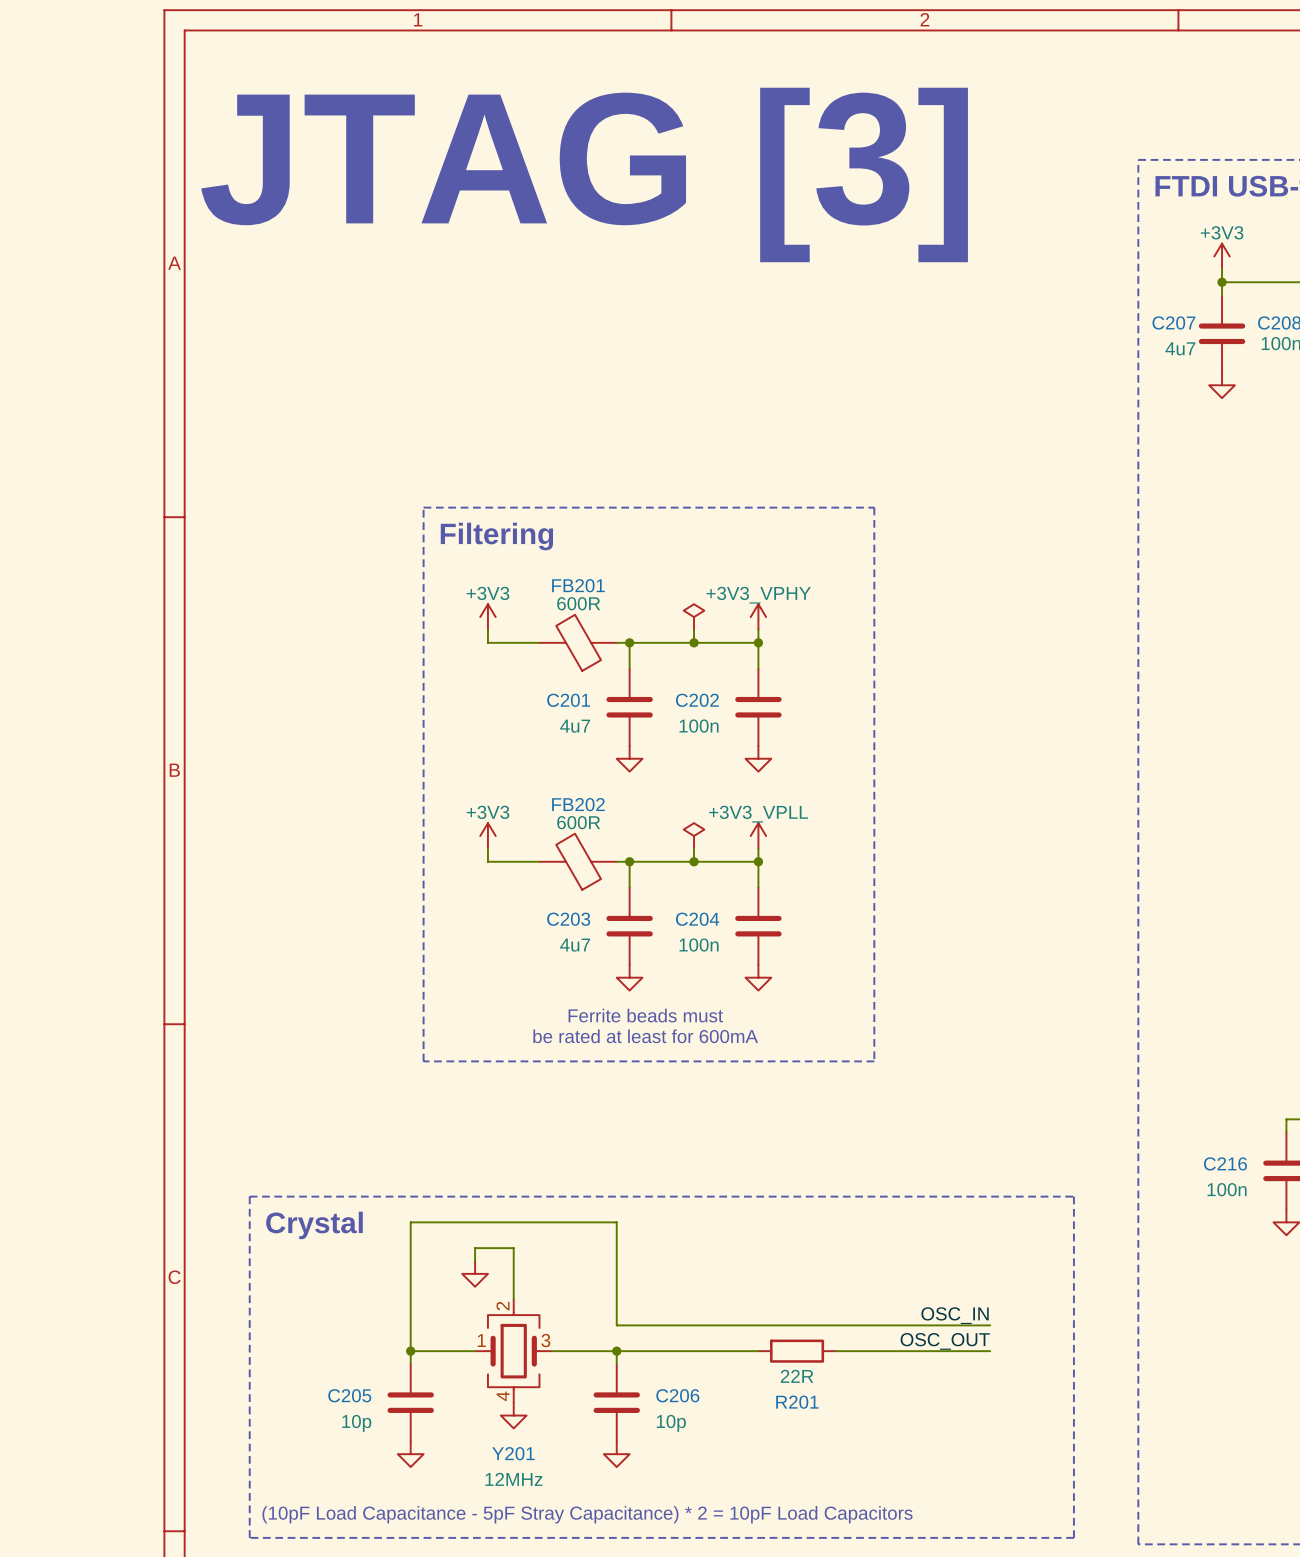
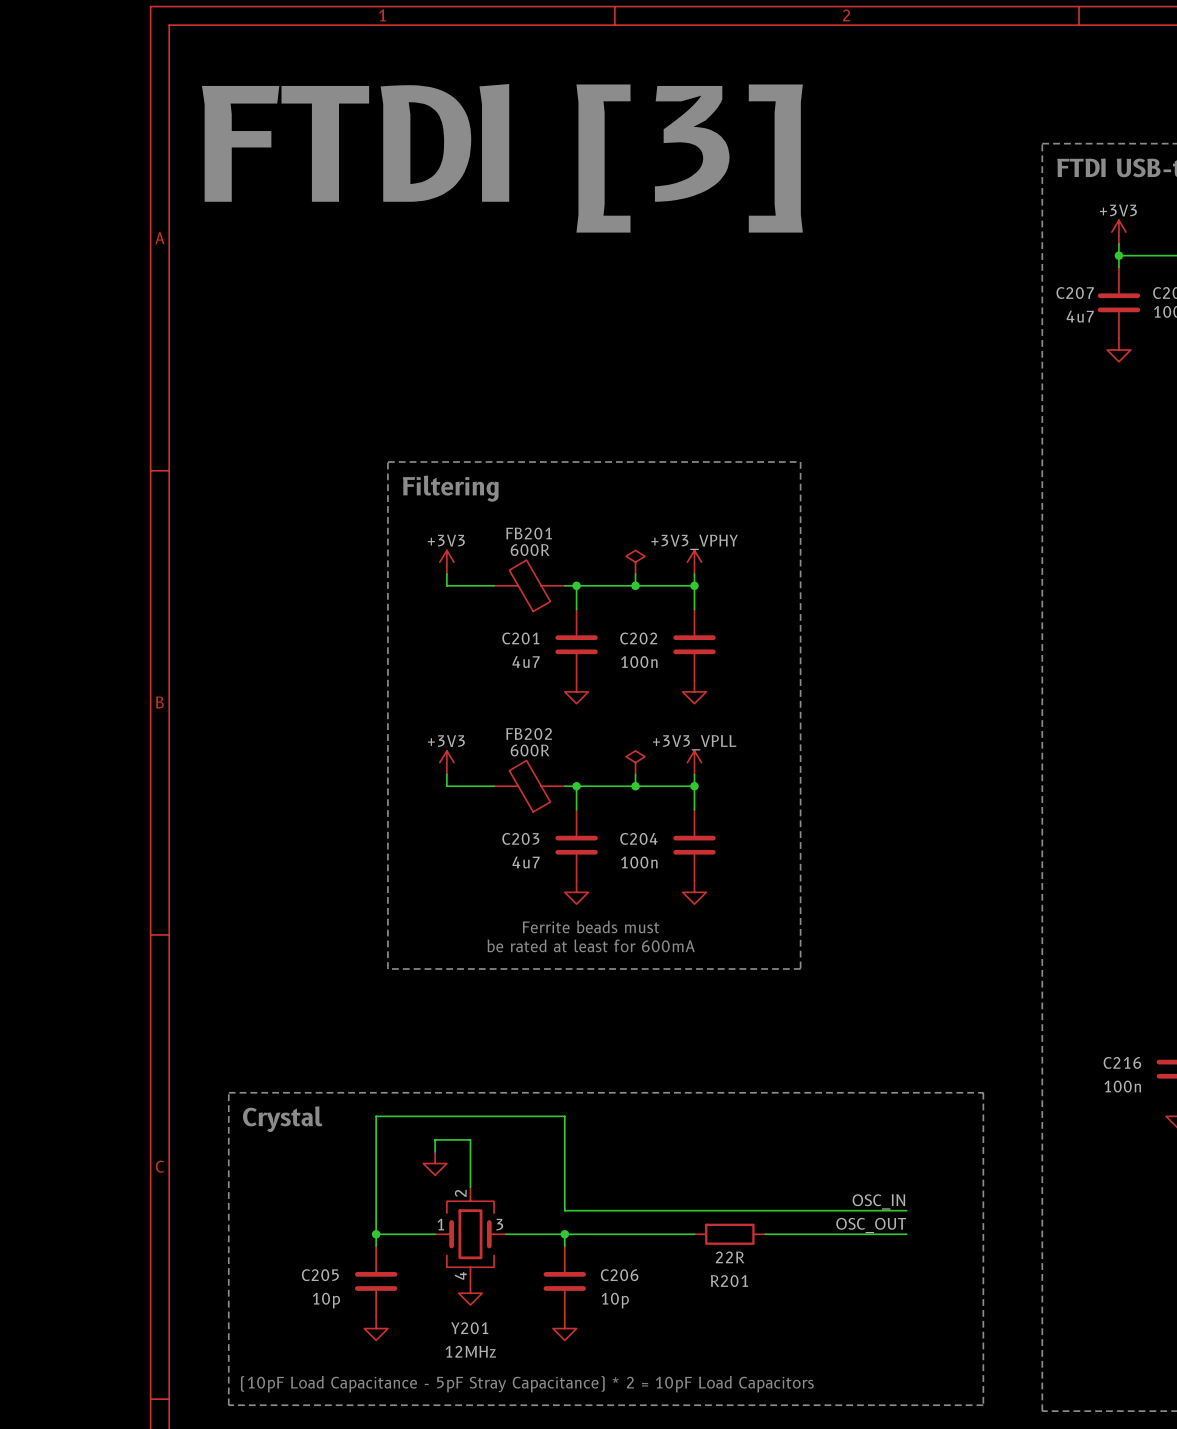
text: JTAG [3] (584, 174) -> FTDI [3] (502, 158)

